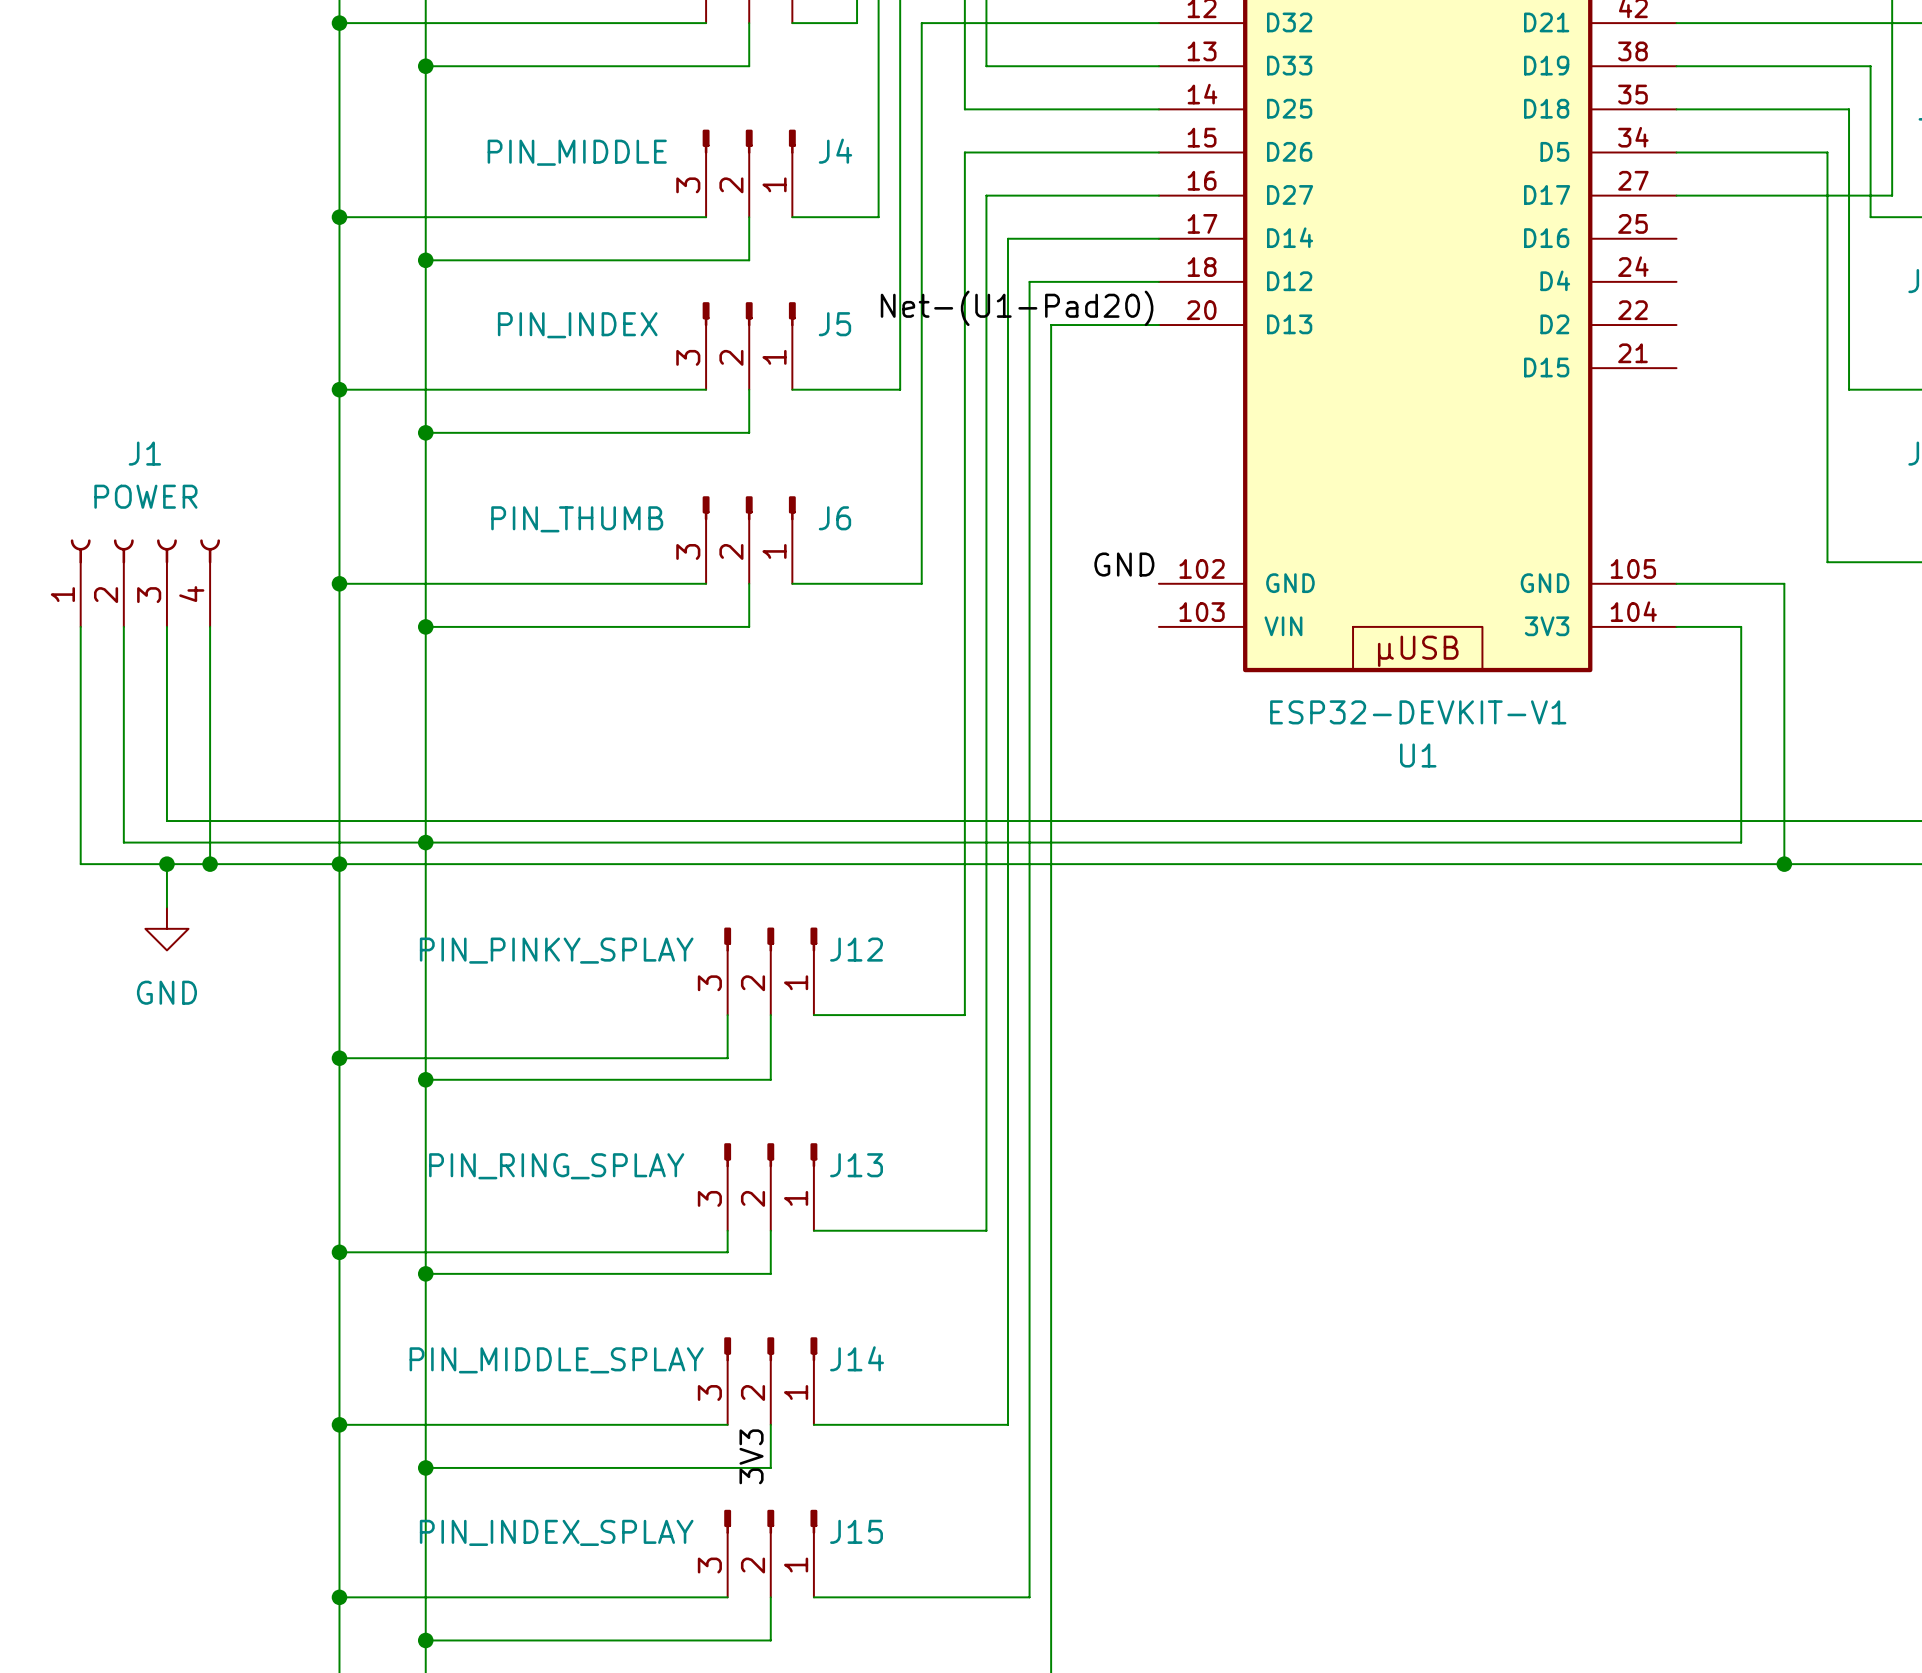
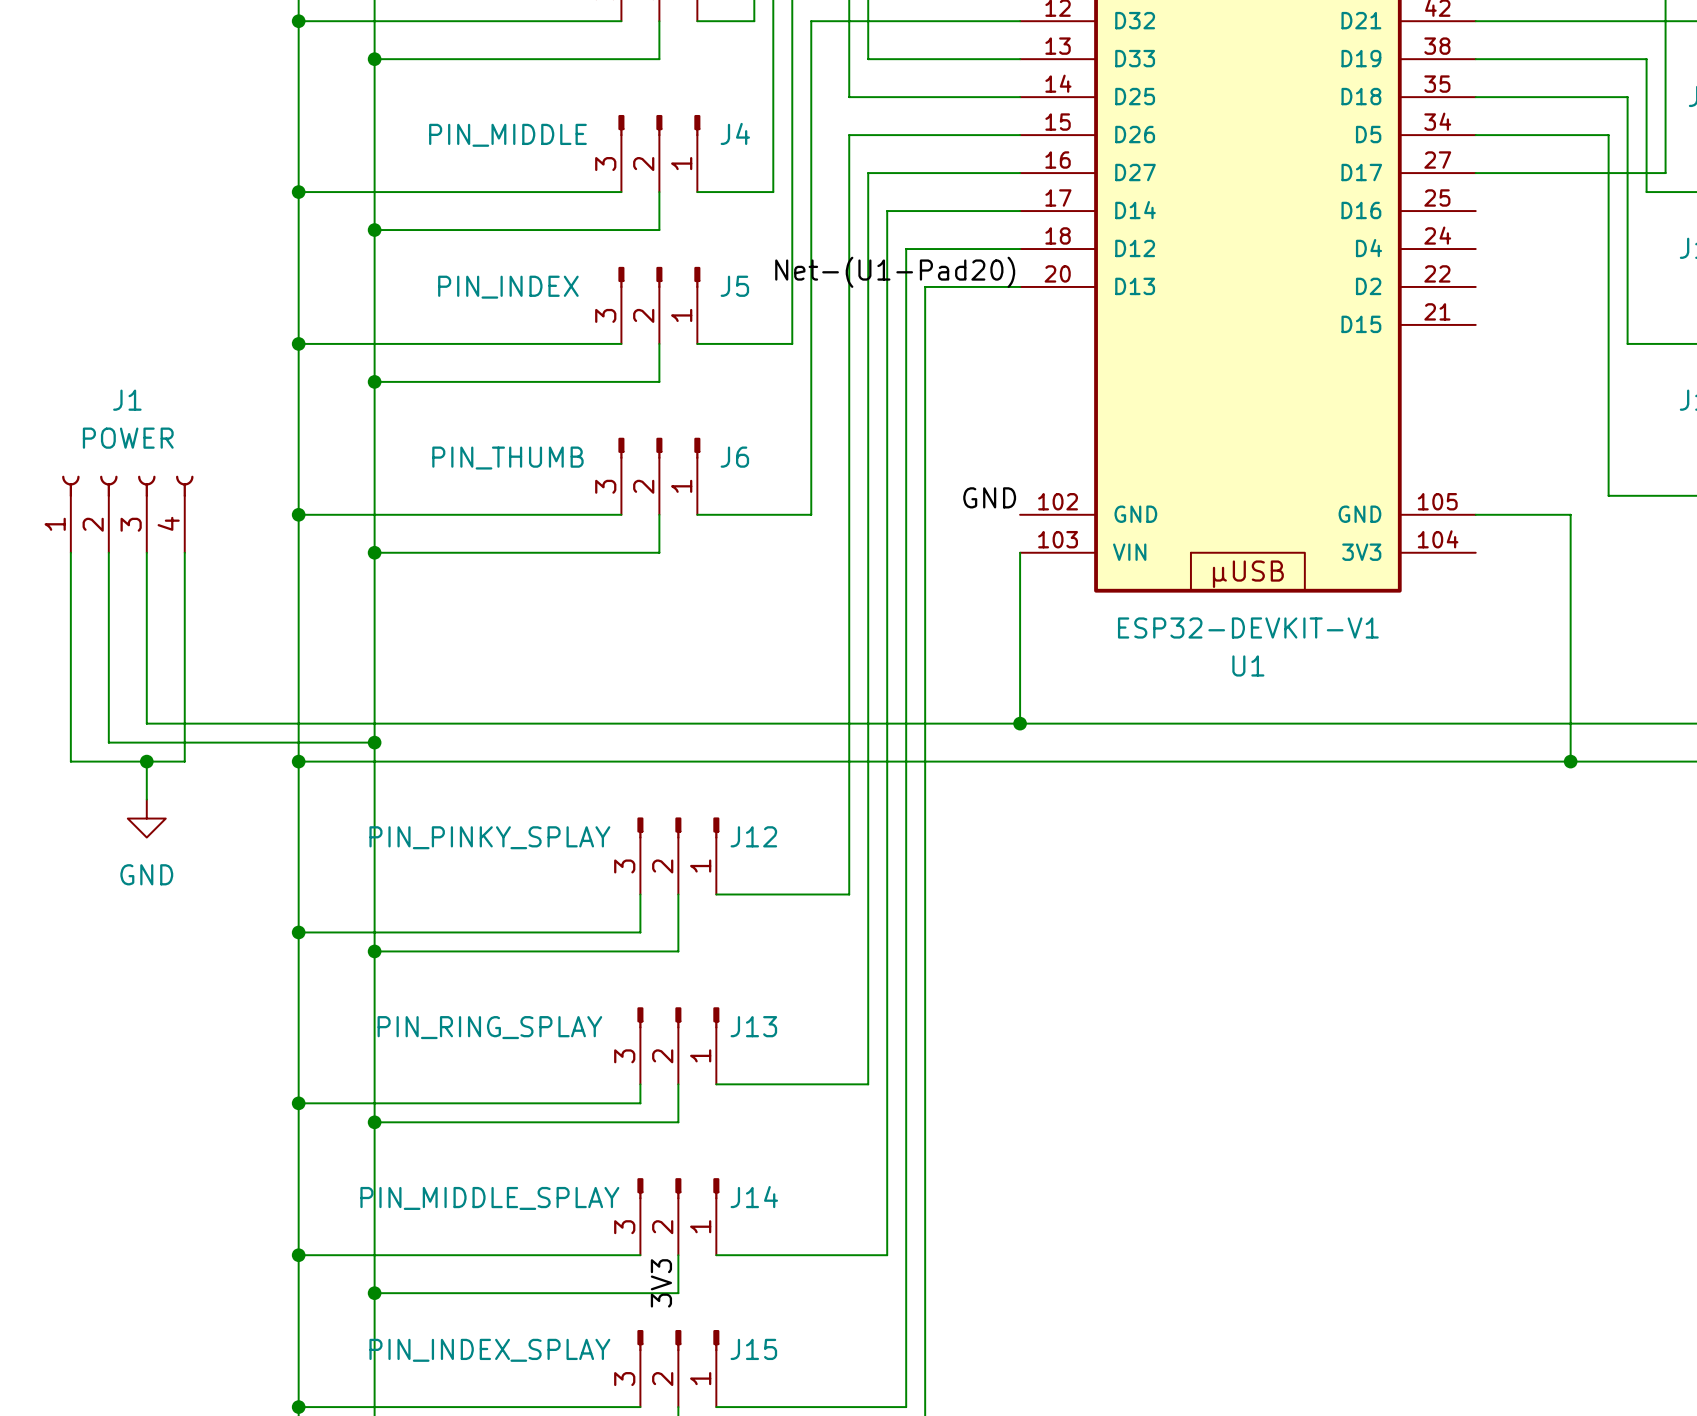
wire: none -> (1020, 552) (1020, 723)
wire: (1676, 626) (1741, 626) (1741, 842) (425, 842) -> none
junction: none -> (1020, 723)
wire: (210, 864) (339, 864) -> none
junction: (210, 864) -> none

